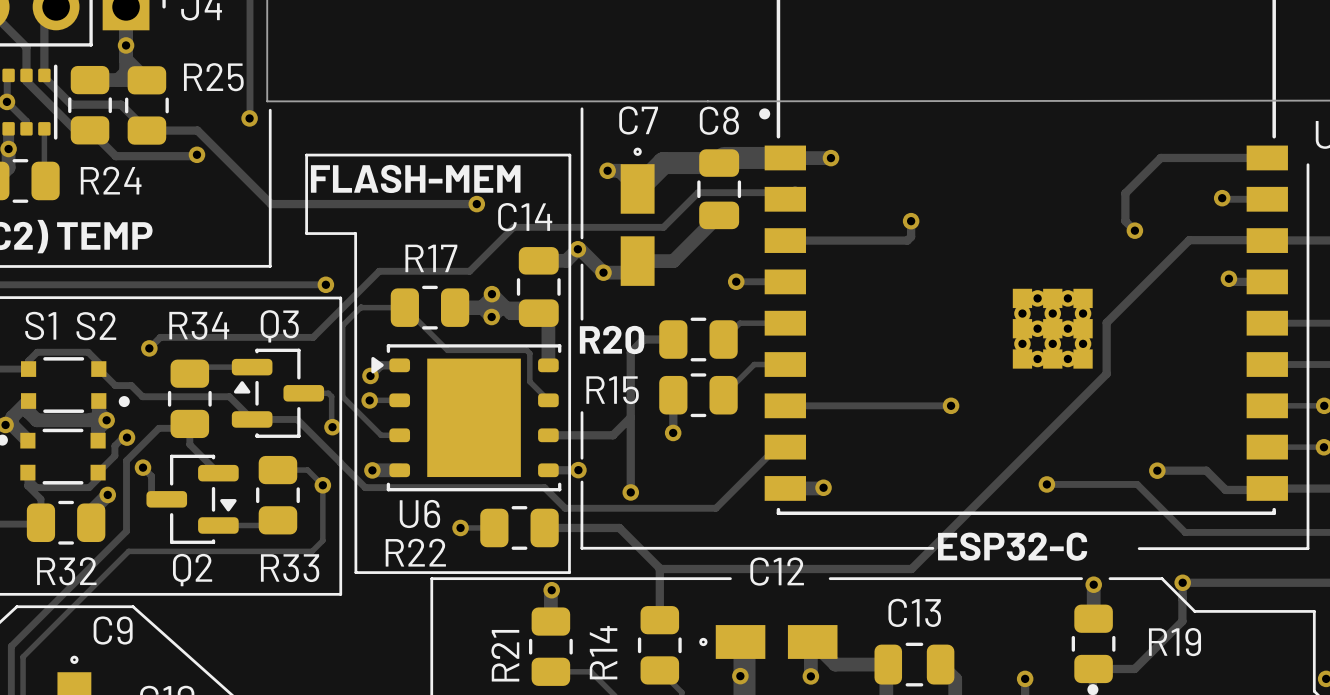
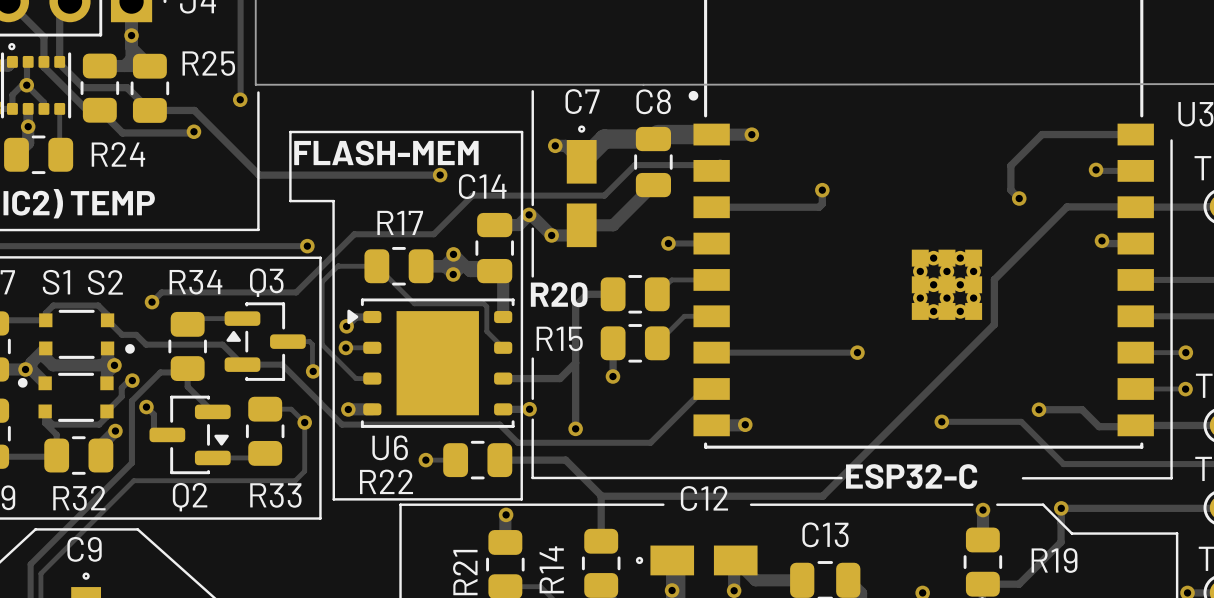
C9 name position: C9 (113, 630) -> C9 (84, 549)

